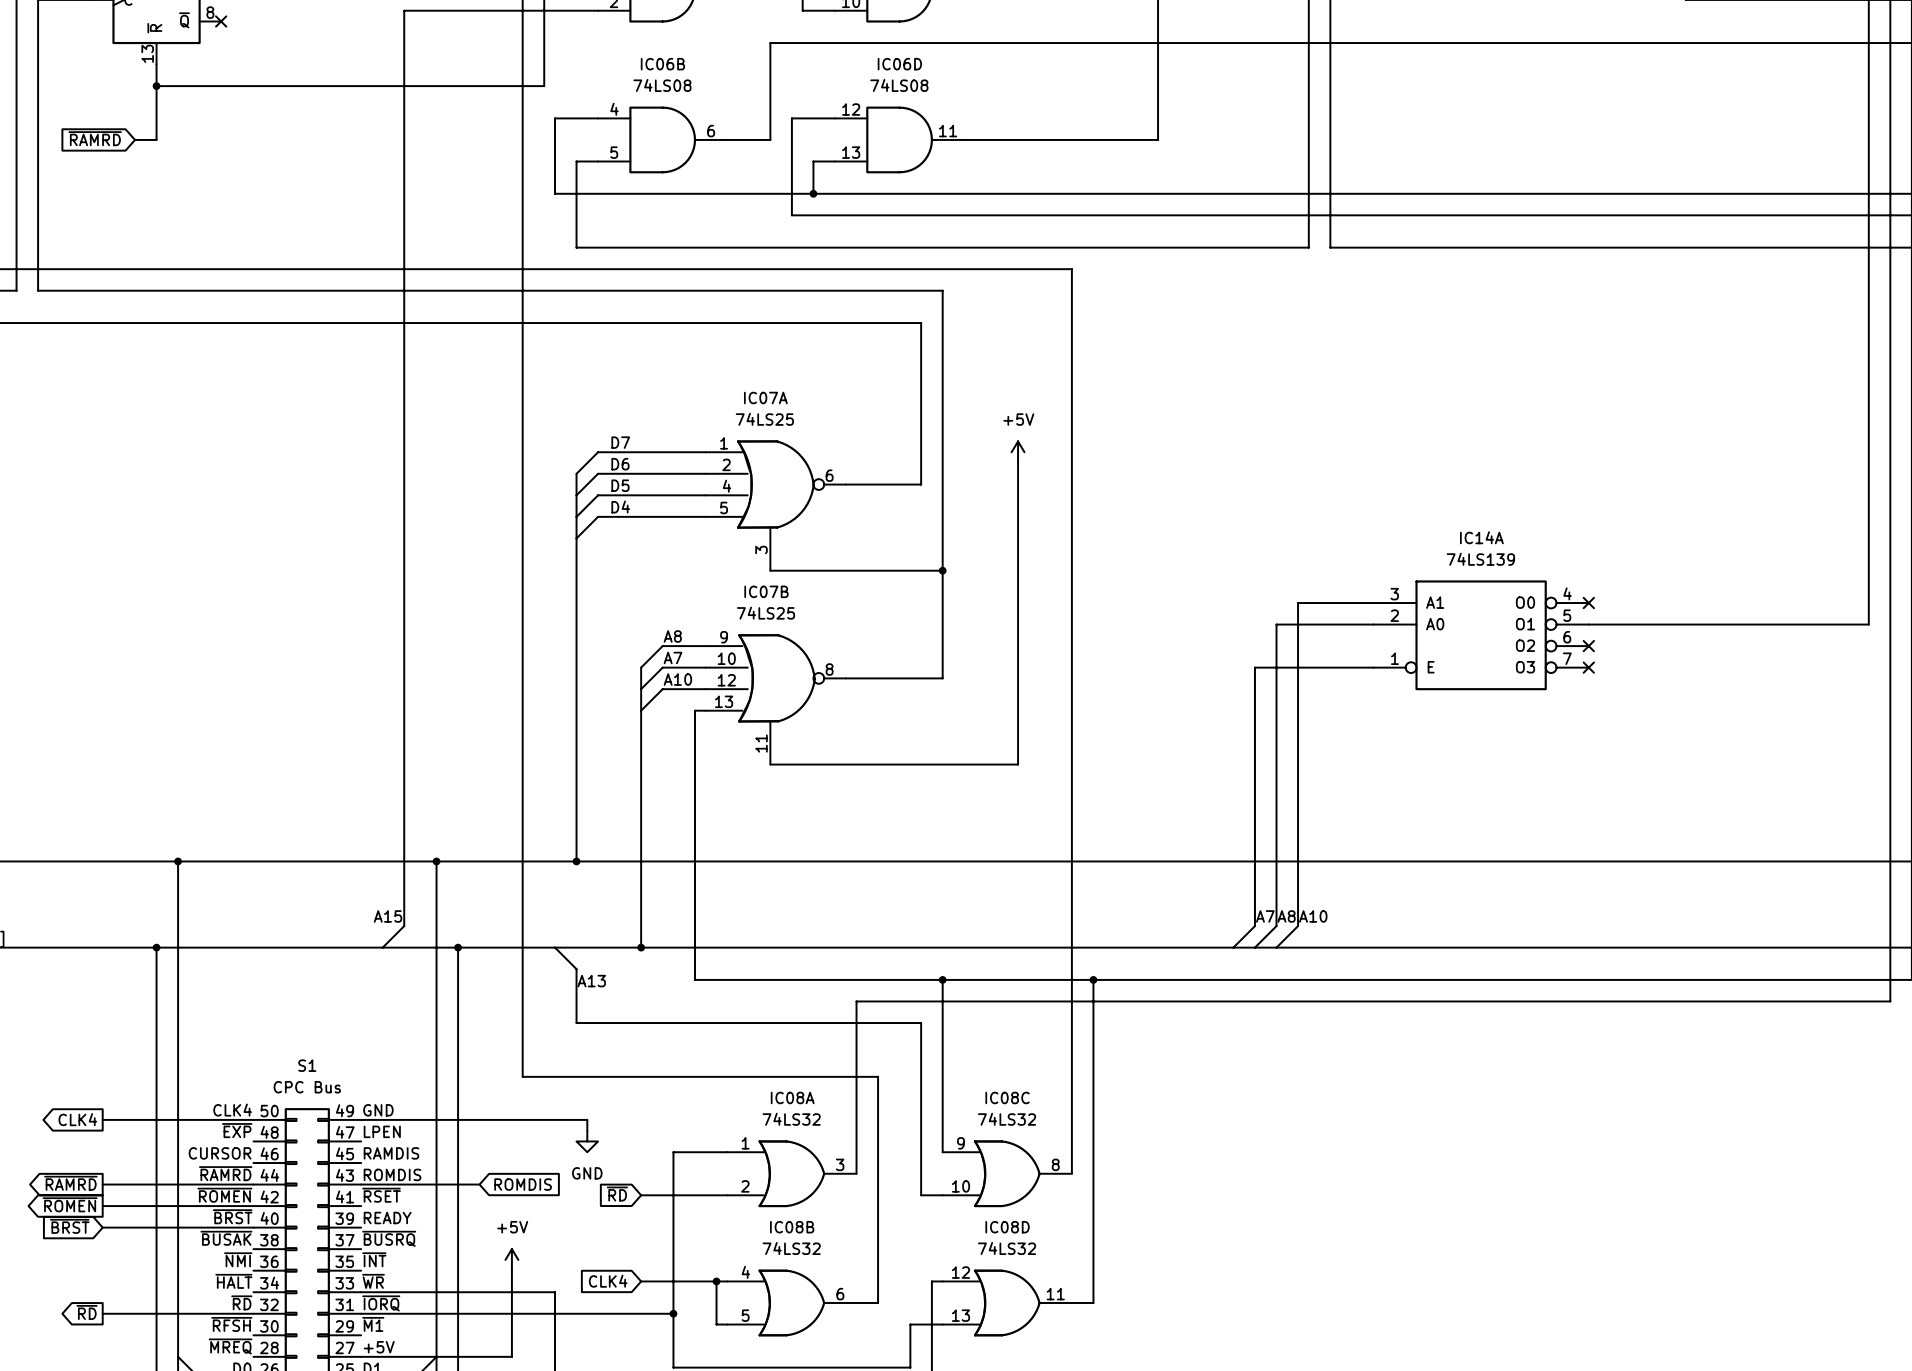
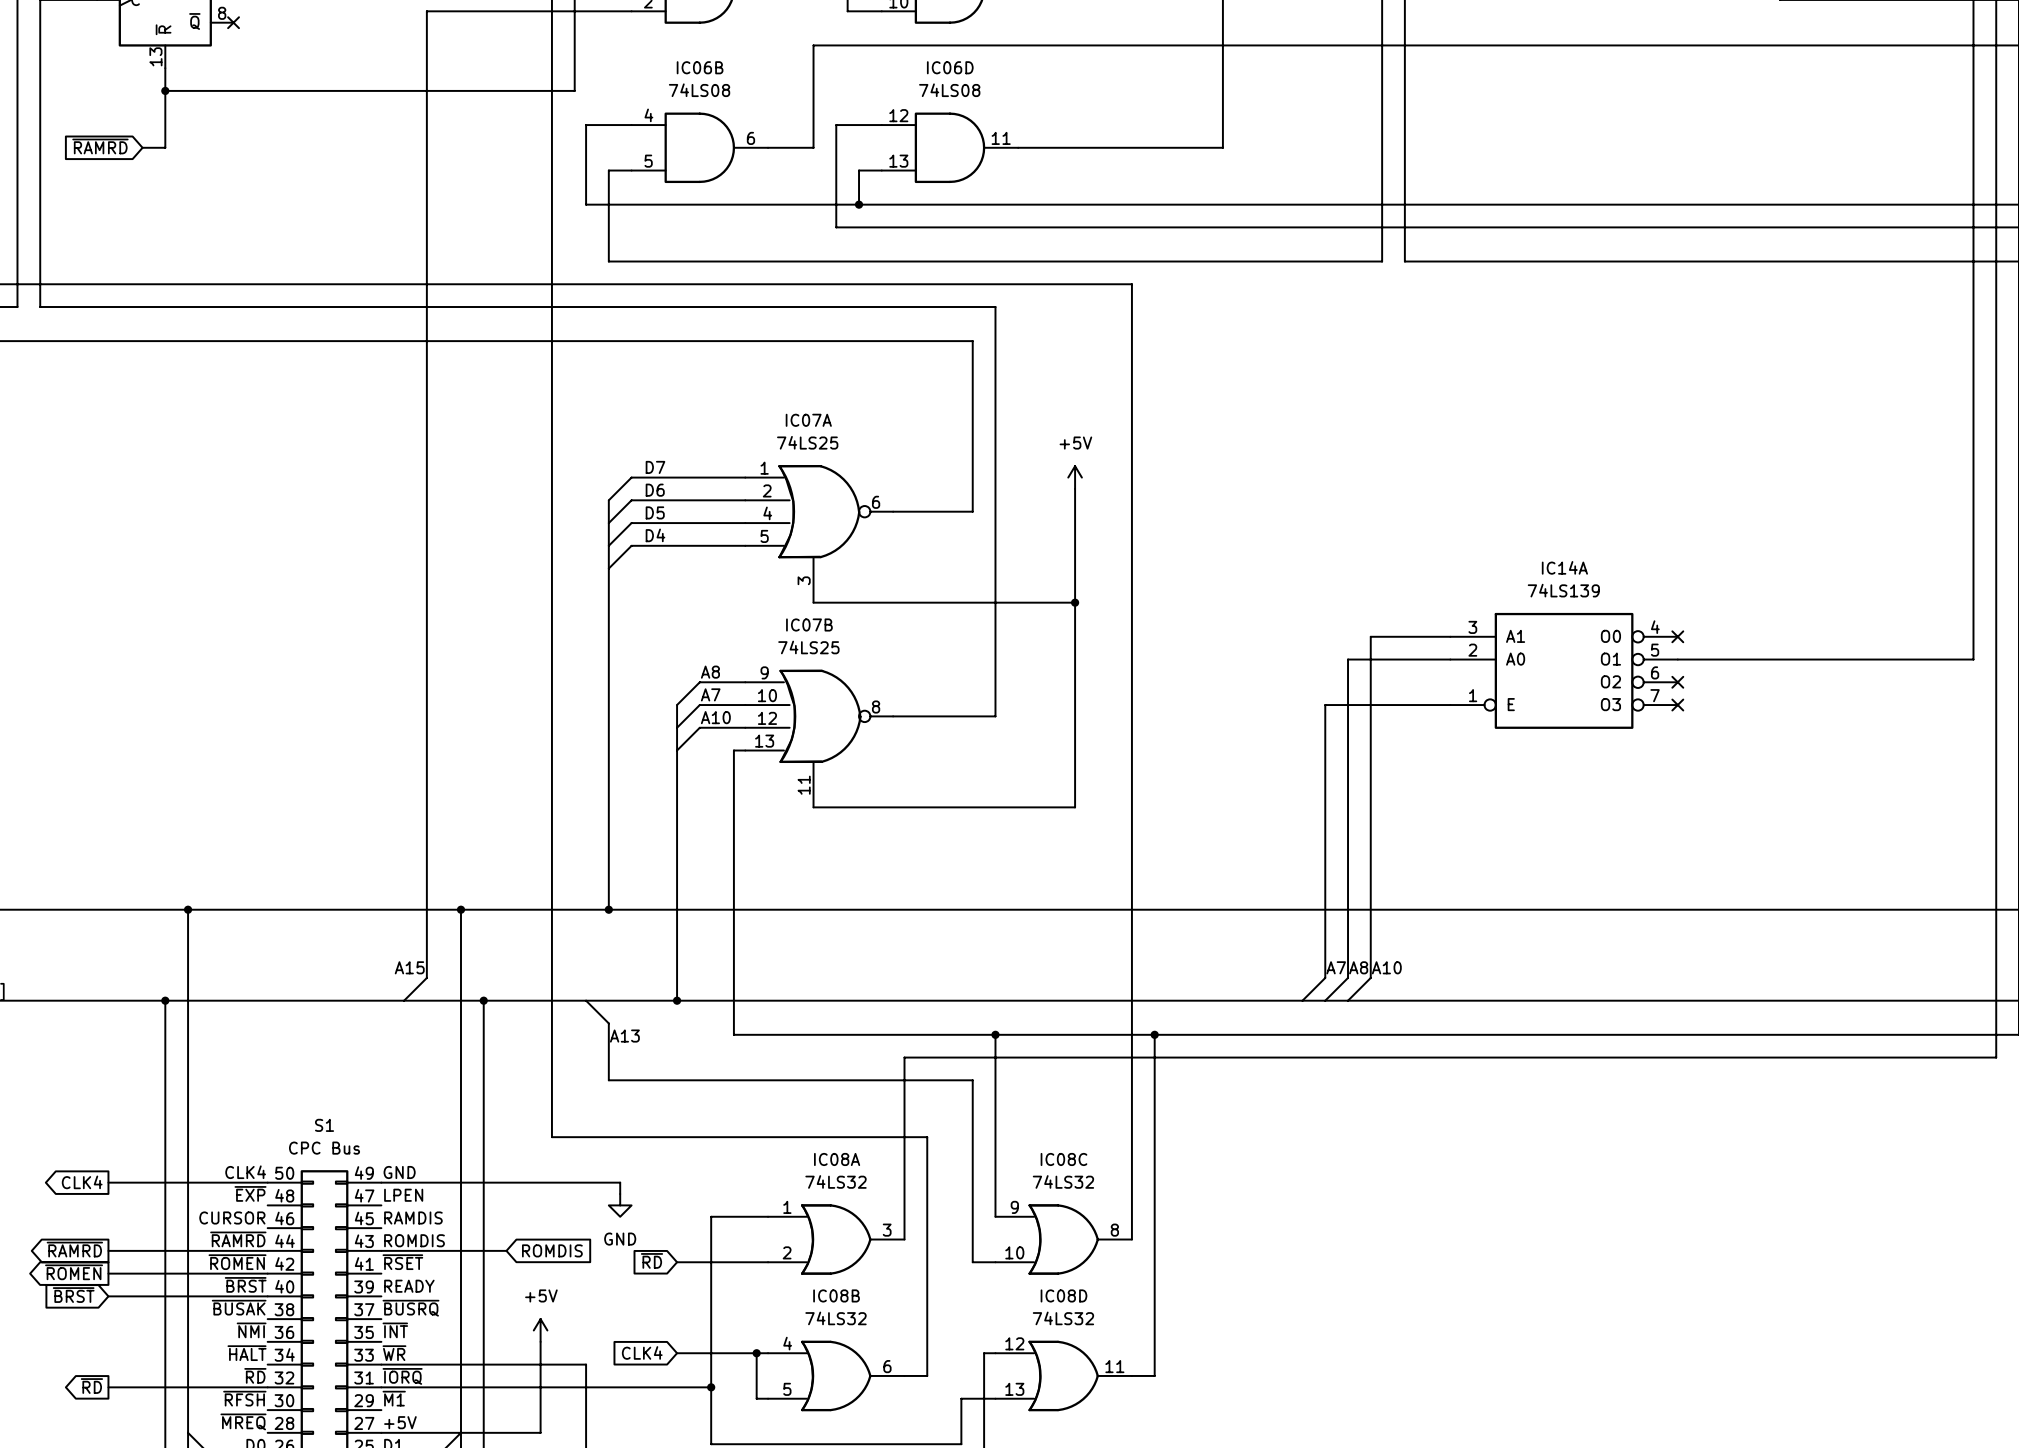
wire: none -> (995, 602) (1075, 602)
junction: (942, 570) -> none
junction: none -> (1075, 602)

